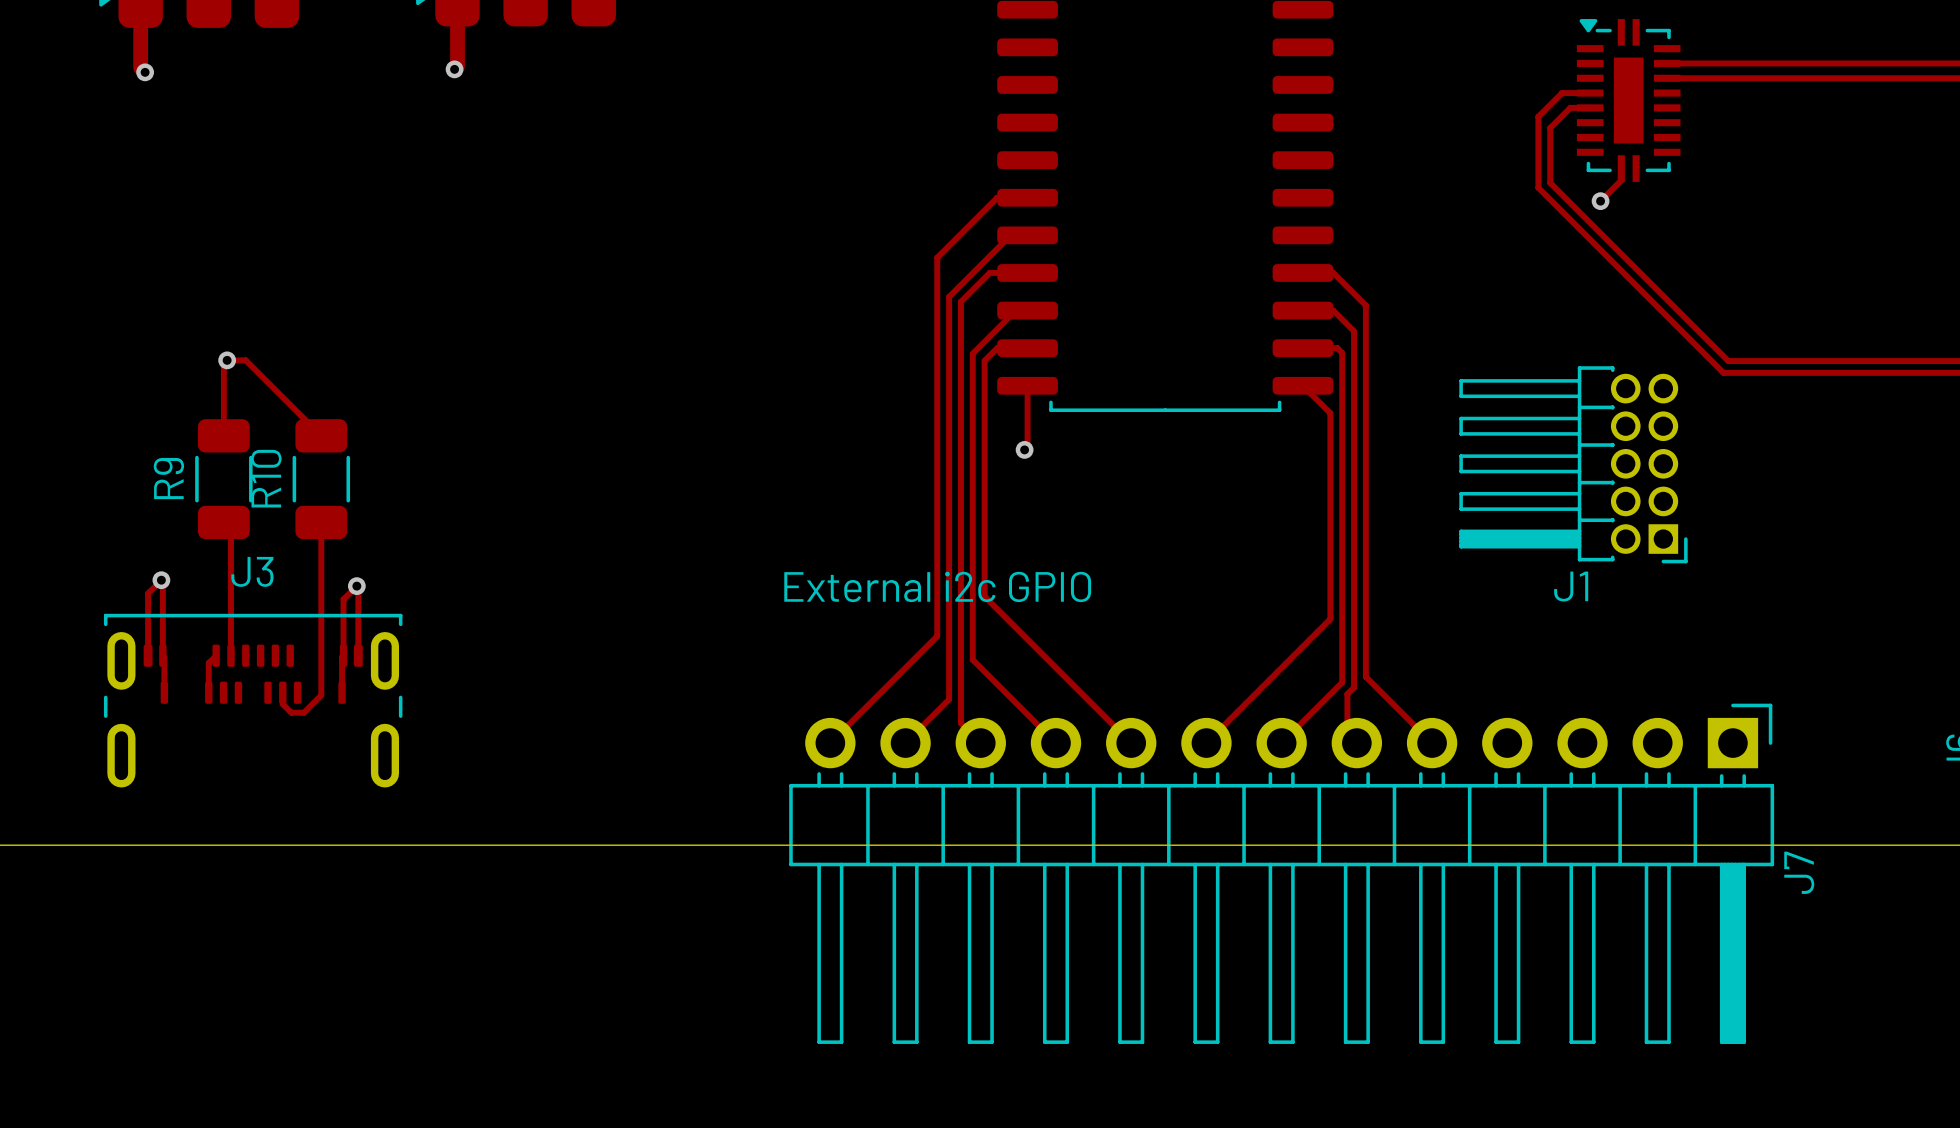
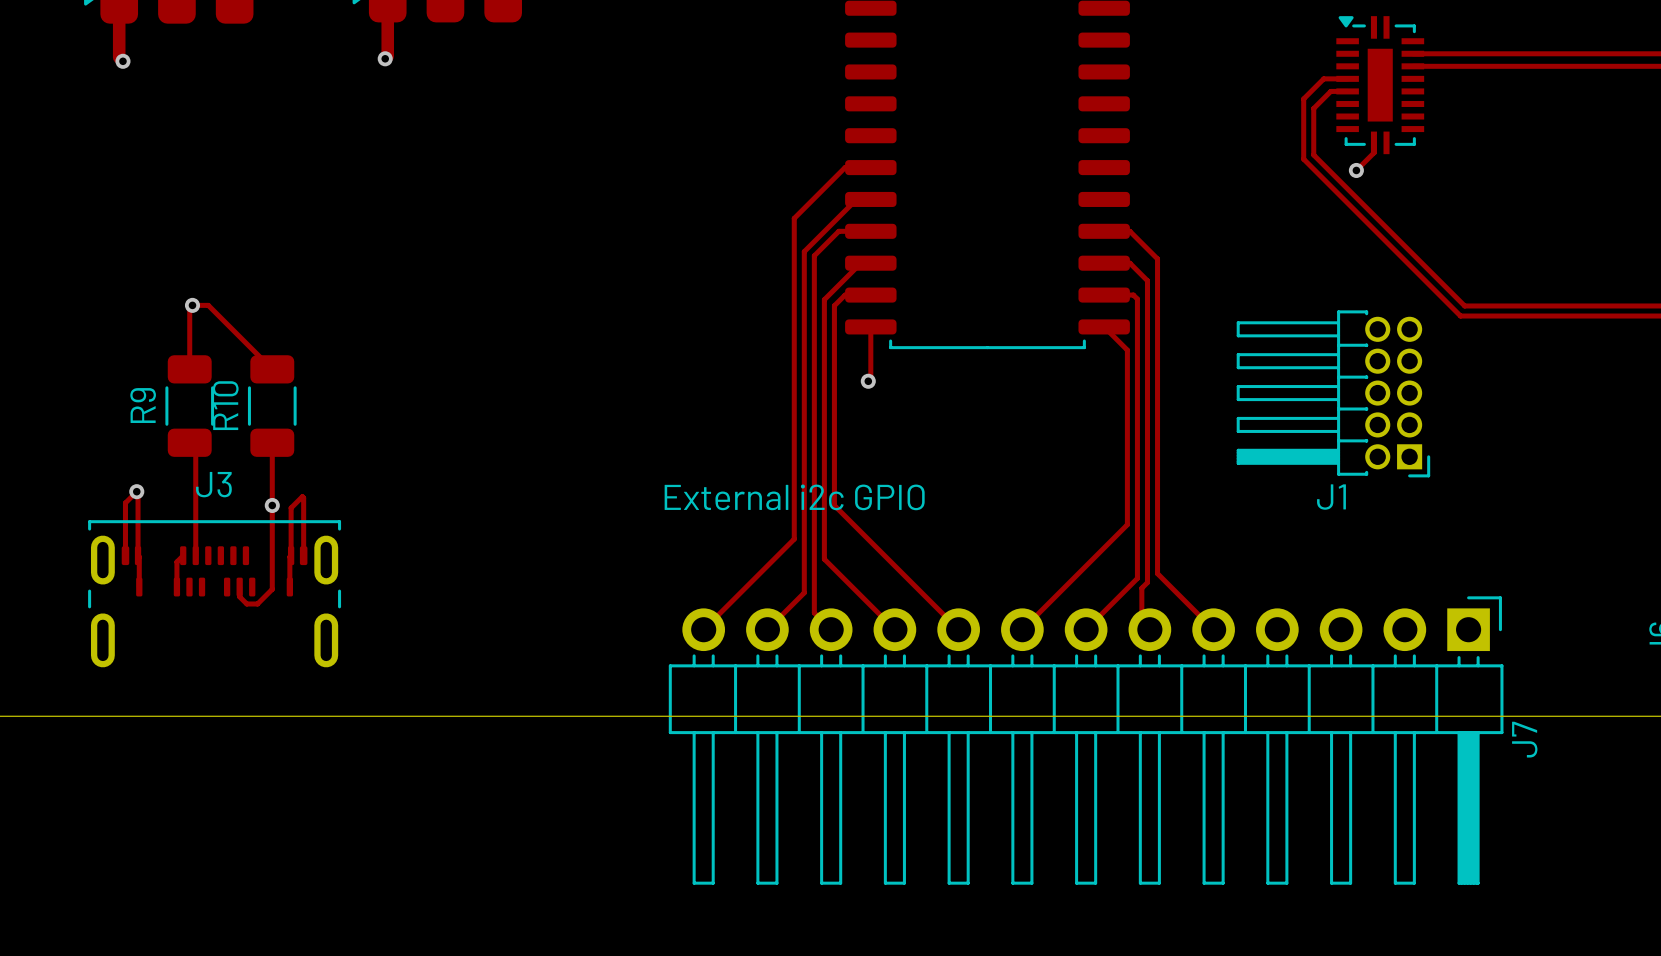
via position: (356, 586) -> (272, 505)

